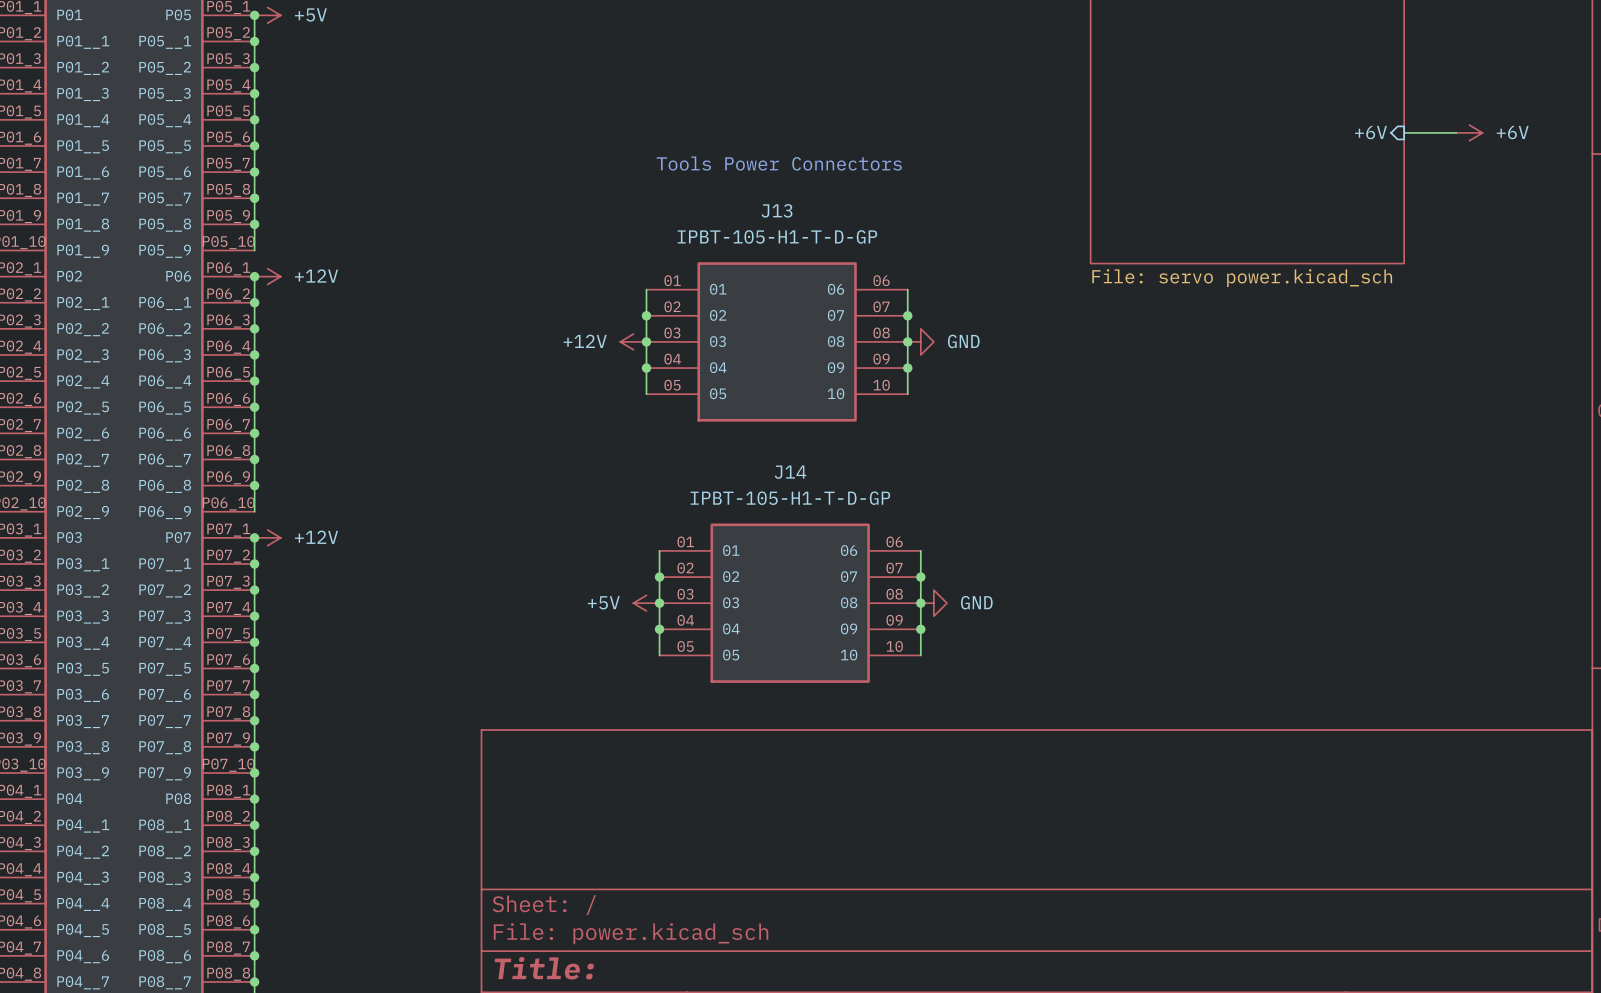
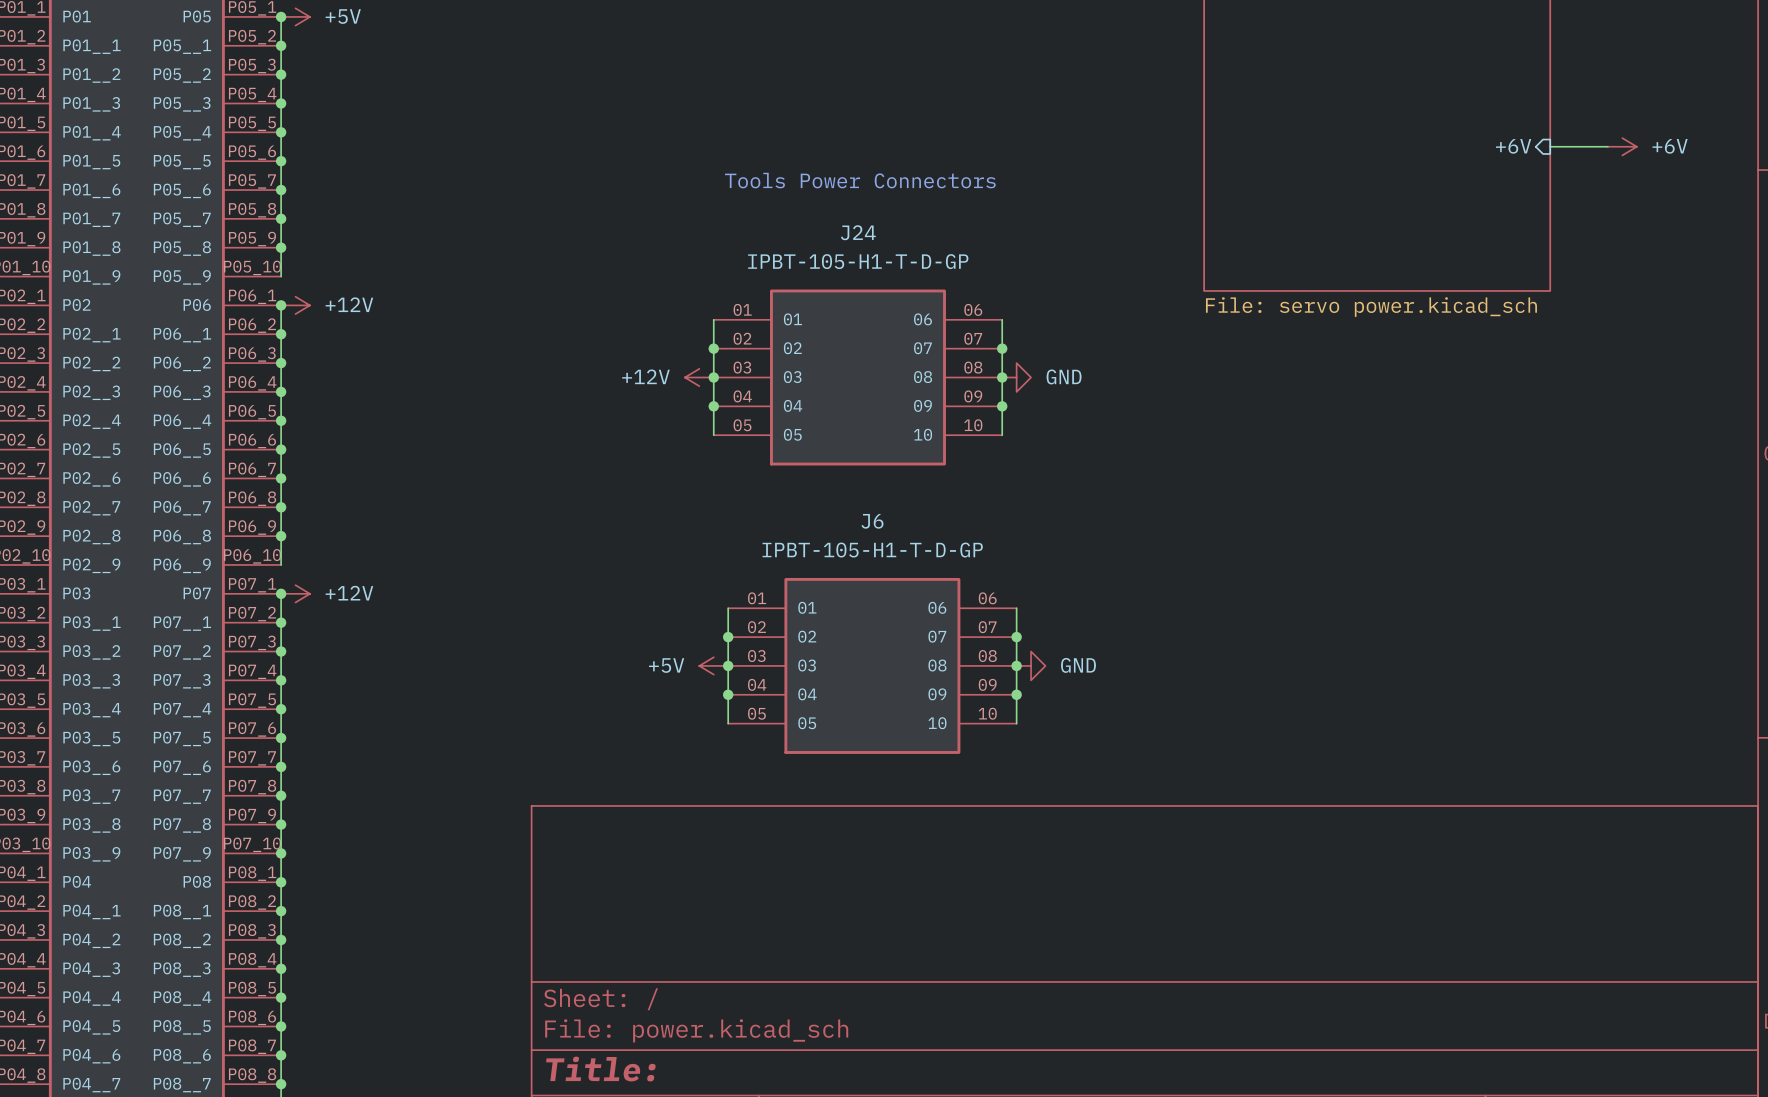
J13 name: J13 (777, 210) -> J24 (858, 232)
J14 name: J14 (790, 472) -> J6 (872, 521)

